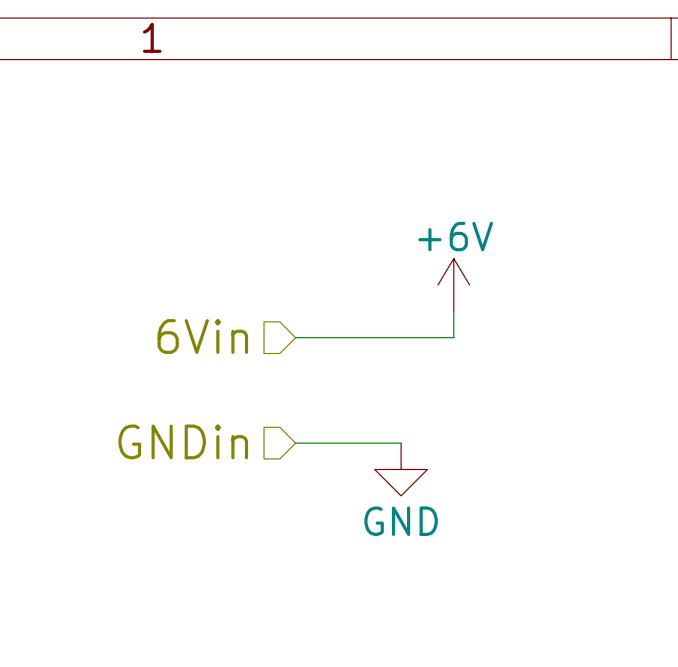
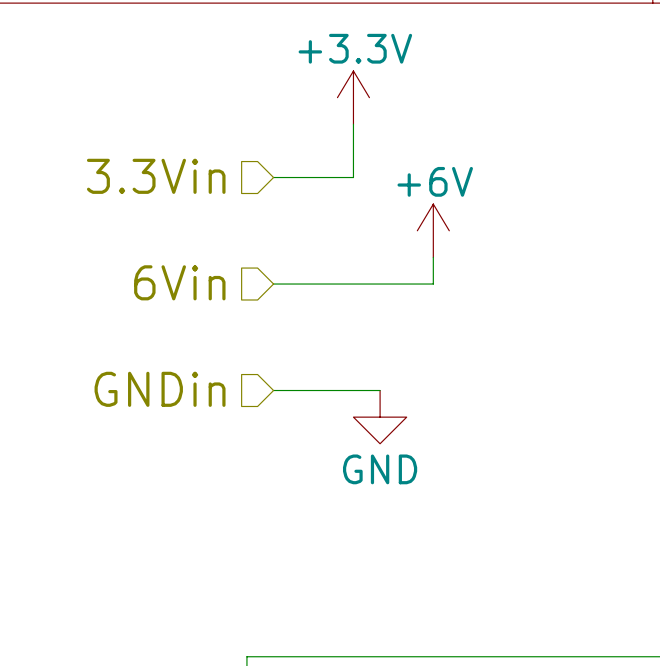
power symbol: none -> +3.3V (353, 97)
wire: none -> (353, 124) (353, 177) (273, 177)
hierarchical label: none -> 3.3Vin (156, 176)

